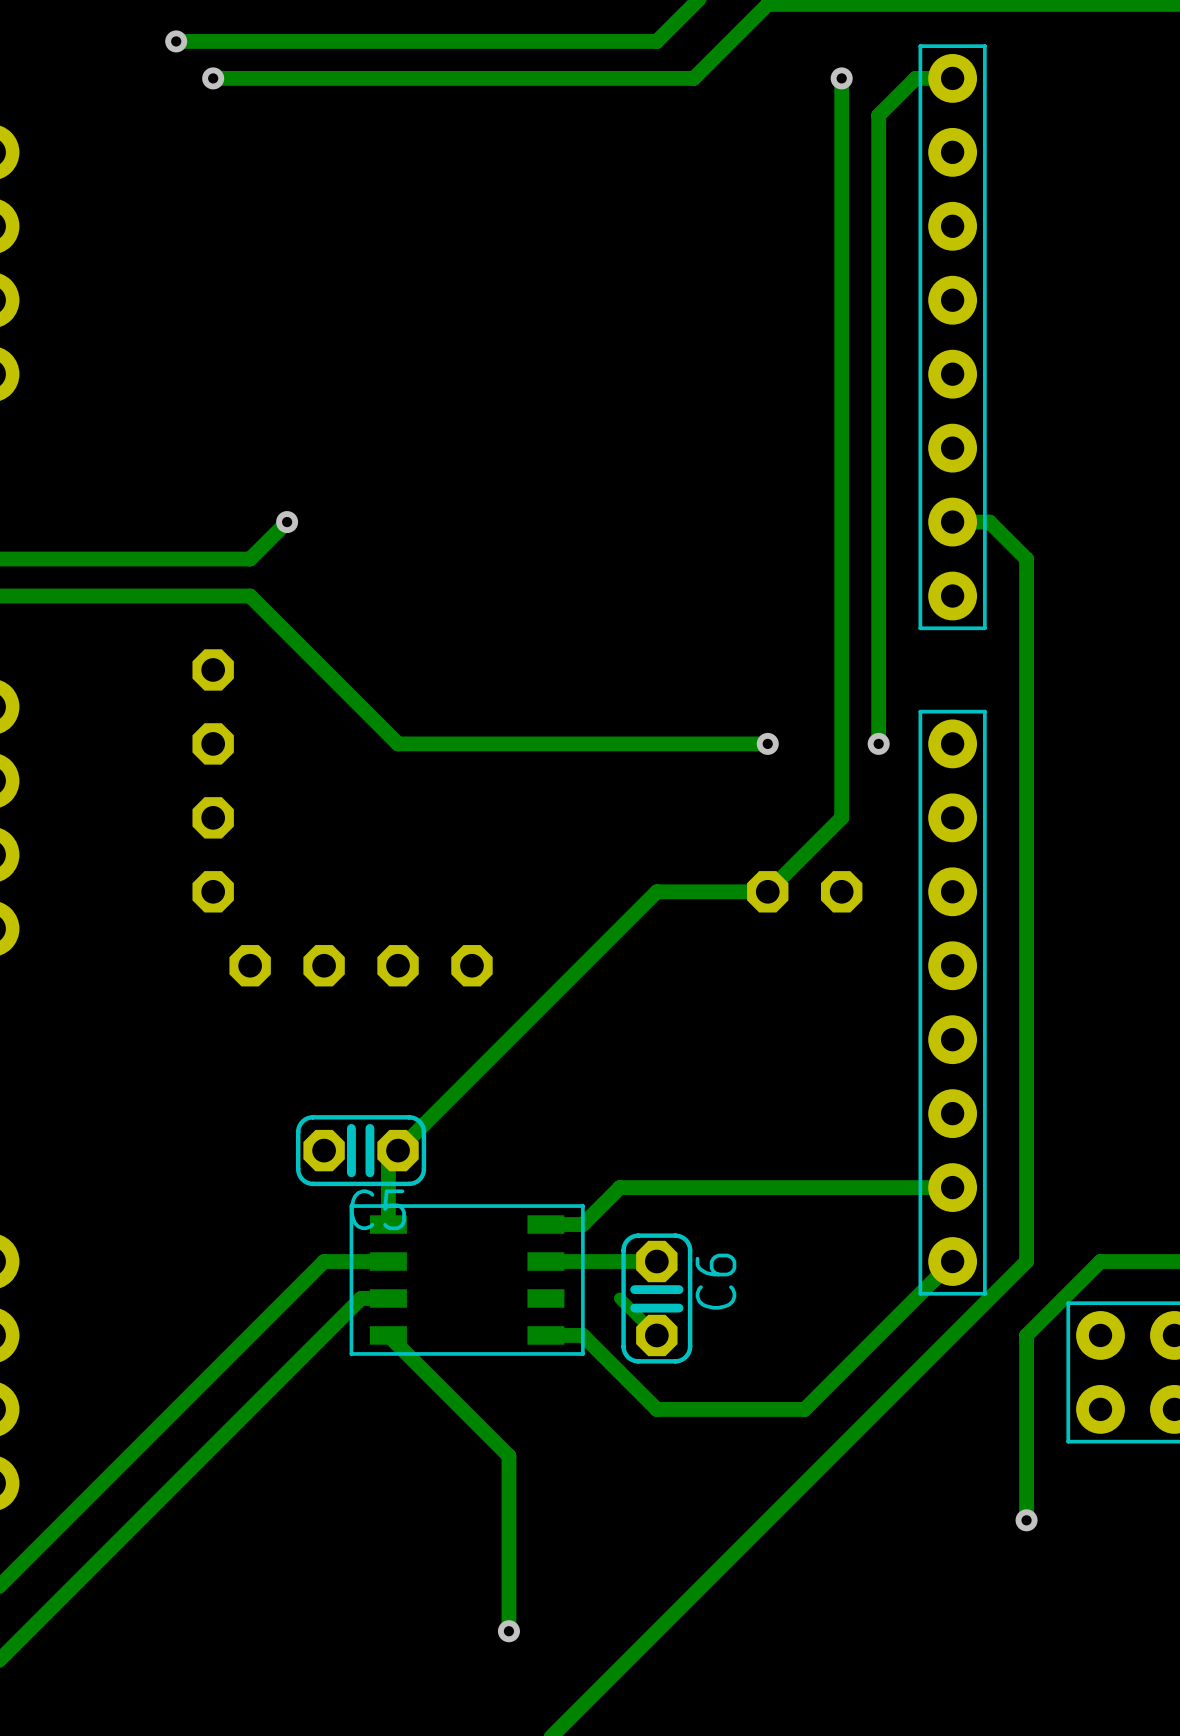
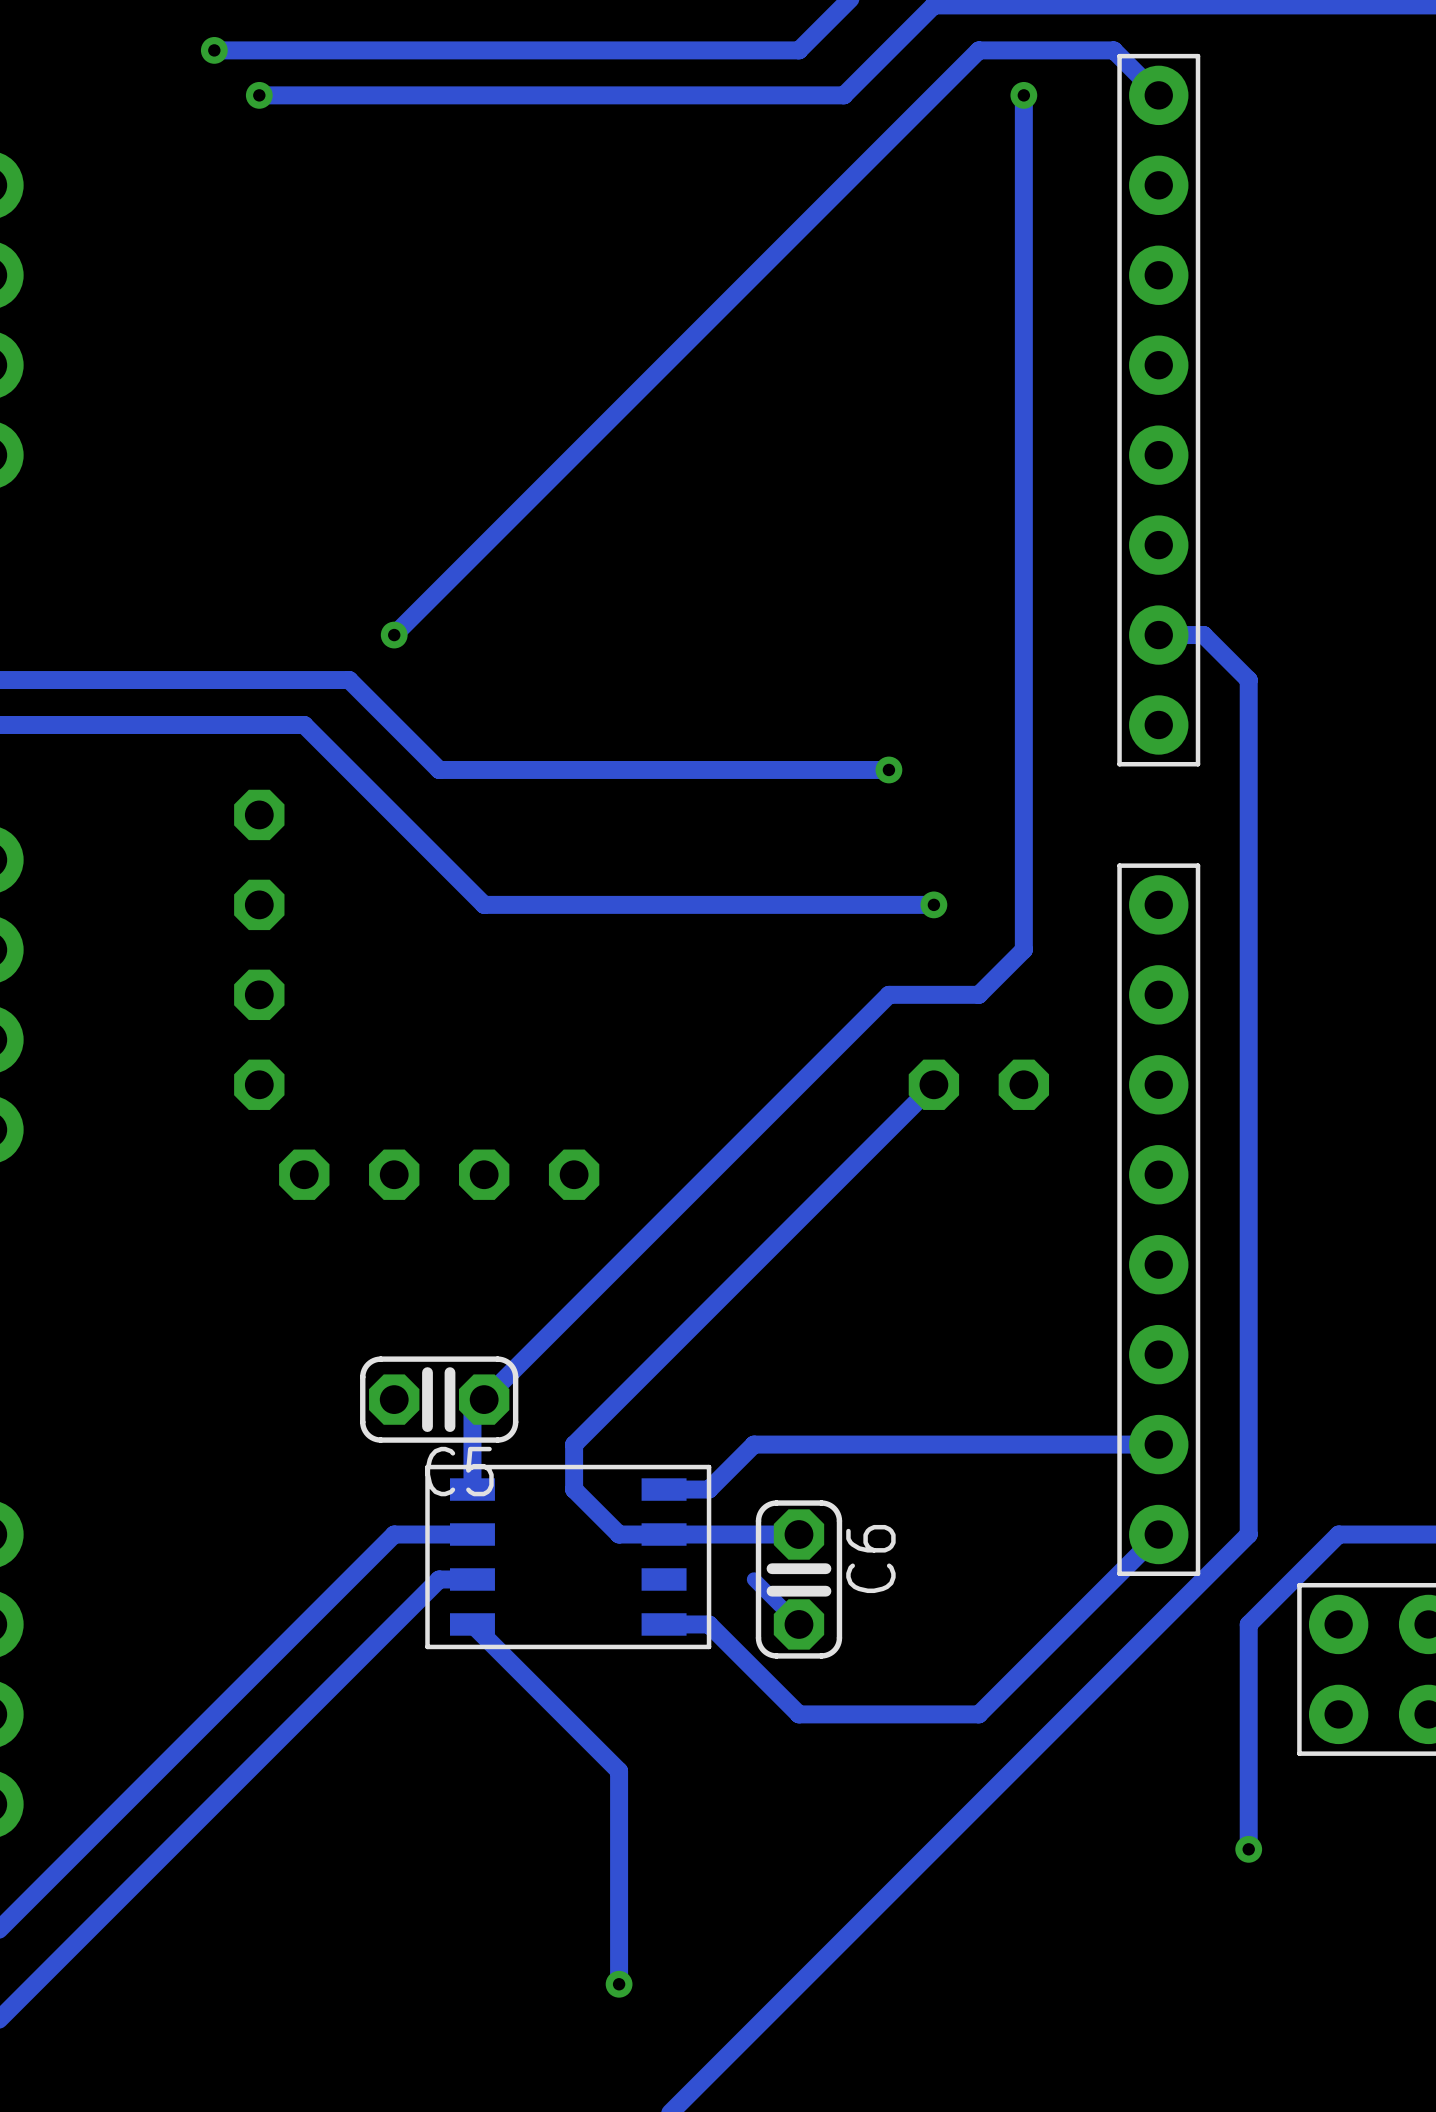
track: (952, 78) (915, 78) (878, 115) (878, 743) -> (1158, 95) (1113, 50) (978, 50) (394, 635)
track: (287, 522) (250, 559) -> (888, 769) (439, 769) (349, 680) (304, 680)
via position: (287, 522) -> (394, 635)
via: none -> (888, 769)
via: (878, 743) -> none
track: (841, 780) (841, 817) (767, 891) (656, 891) -> (1023, 949) (978, 994) (888, 994) (798, 1084)
track: none -> (933, 1084) (574, 1444) (574, 1489) (619, 1534) (664, 1534)

